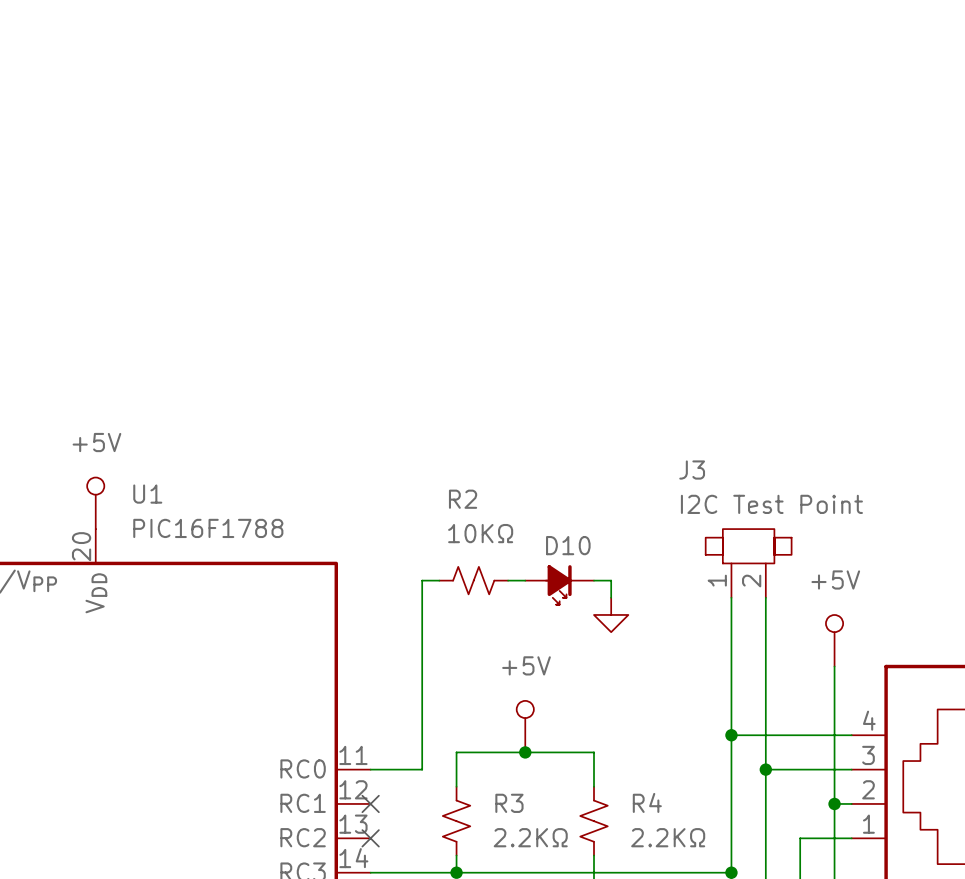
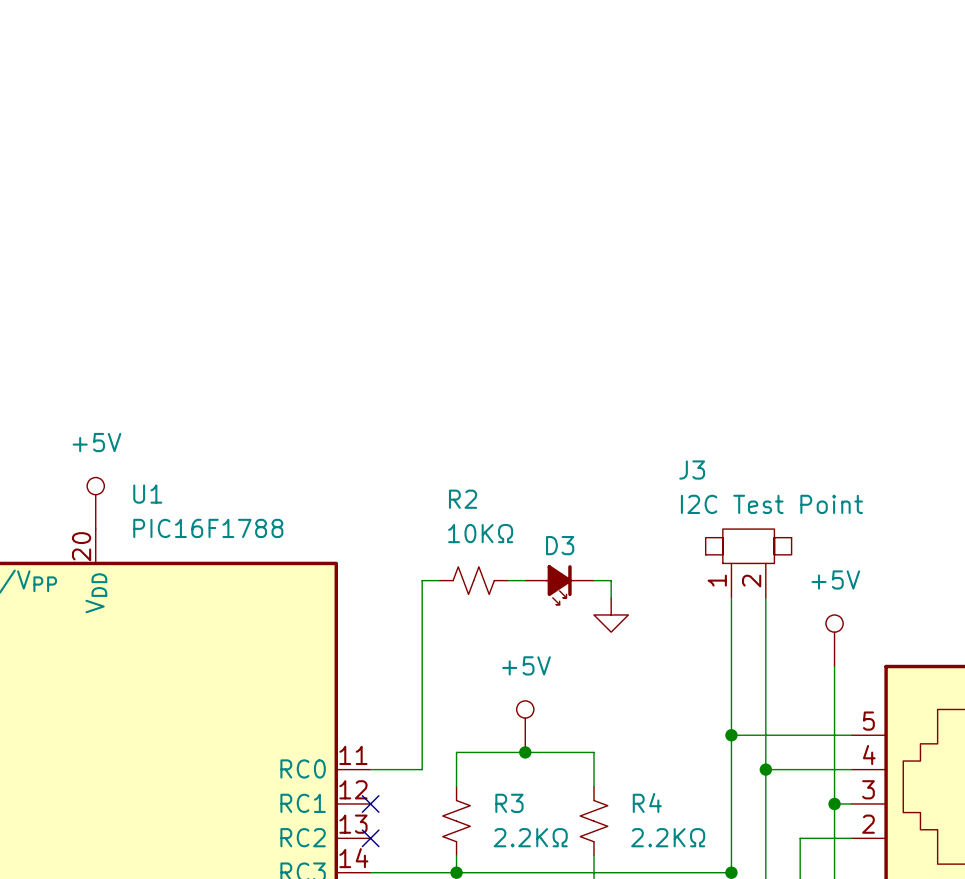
D10 name: D10 (568, 545) -> D3 (560, 545)
part pin number: 4 (869, 720) -> 5 (868, 721)
part pin number: 3 (868, 755) -> 4 (869, 755)
part pin number: 2 (868, 789) -> 3 (868, 789)
part pin number: 1 (868, 824) -> 2 (868, 824)

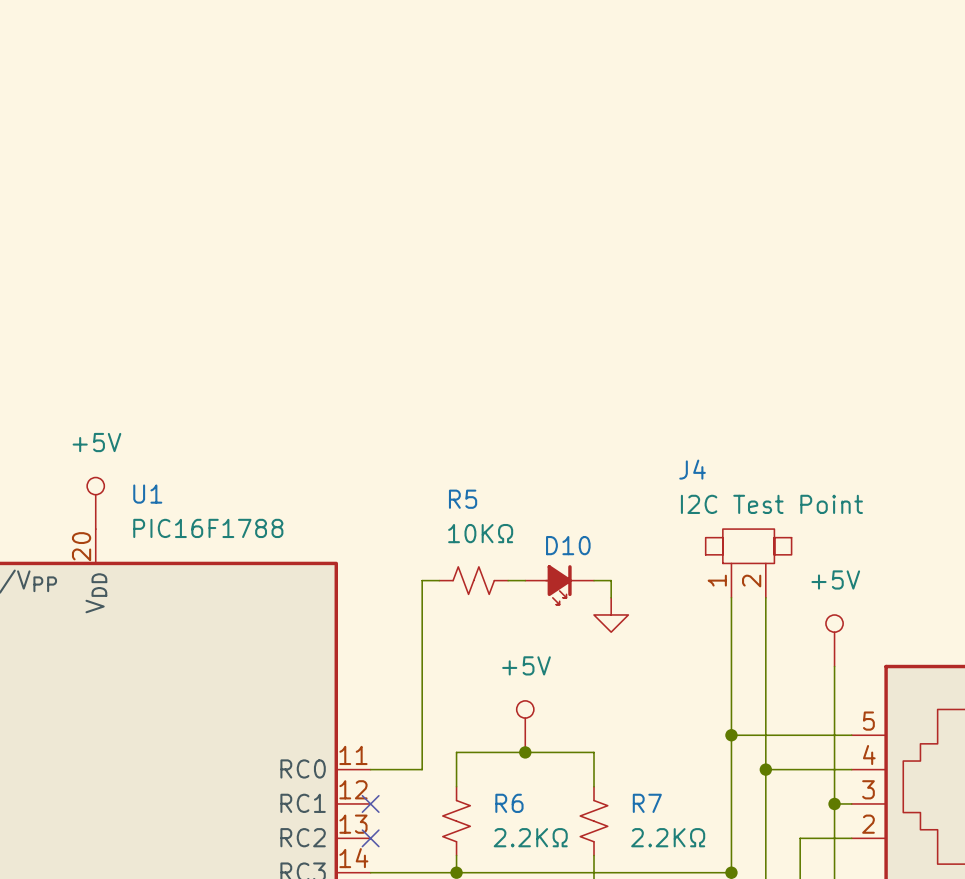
J3 name: J3 (692, 470) -> J4 (692, 469)
R2 name: R2 (463, 499) -> R5 (463, 499)
D3 name: D3 (560, 545) -> D10 (568, 545)
R4 name: R4 (647, 802) -> R7 (647, 803)
R3 name: R3 (509, 803) -> R6 (509, 803)

